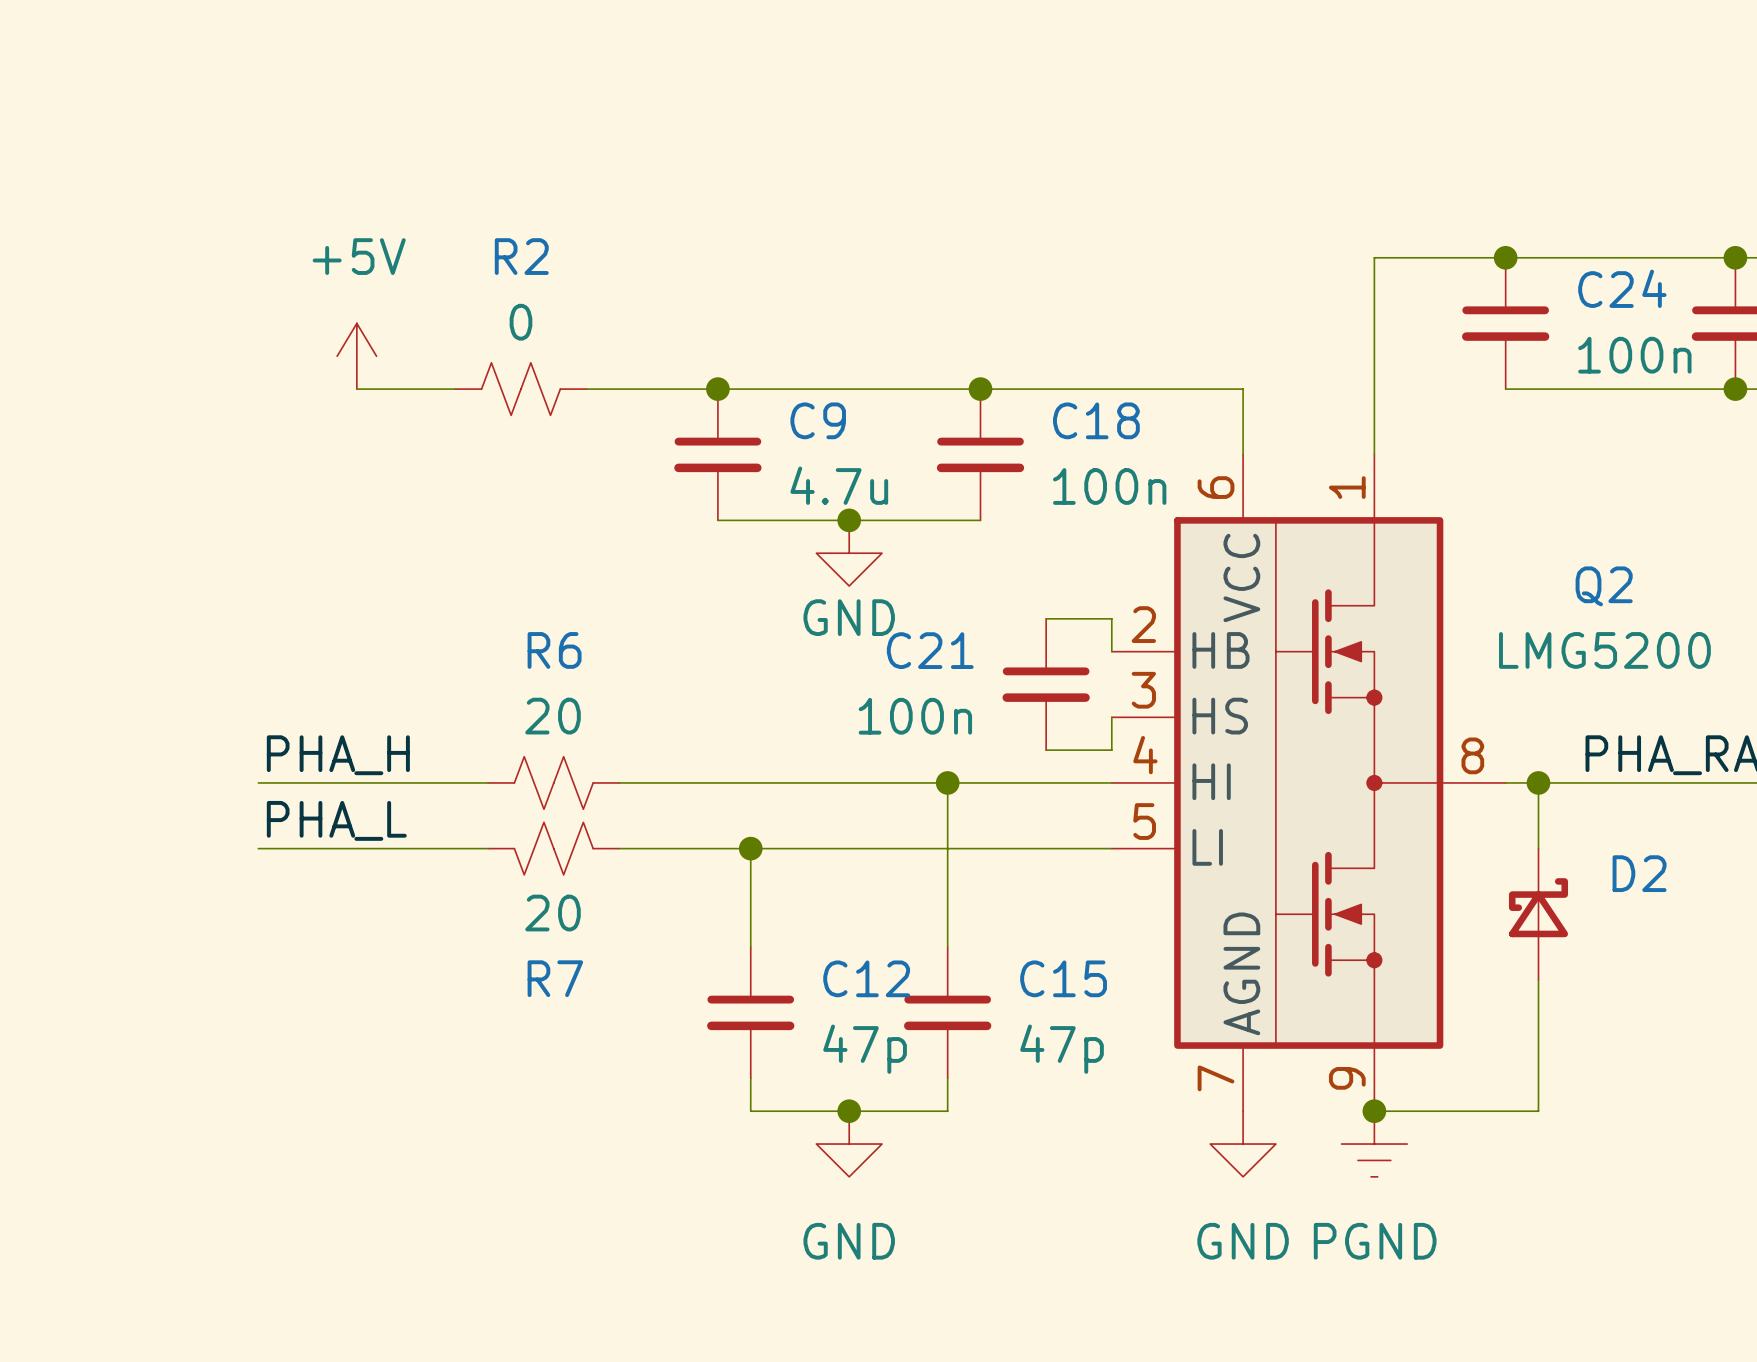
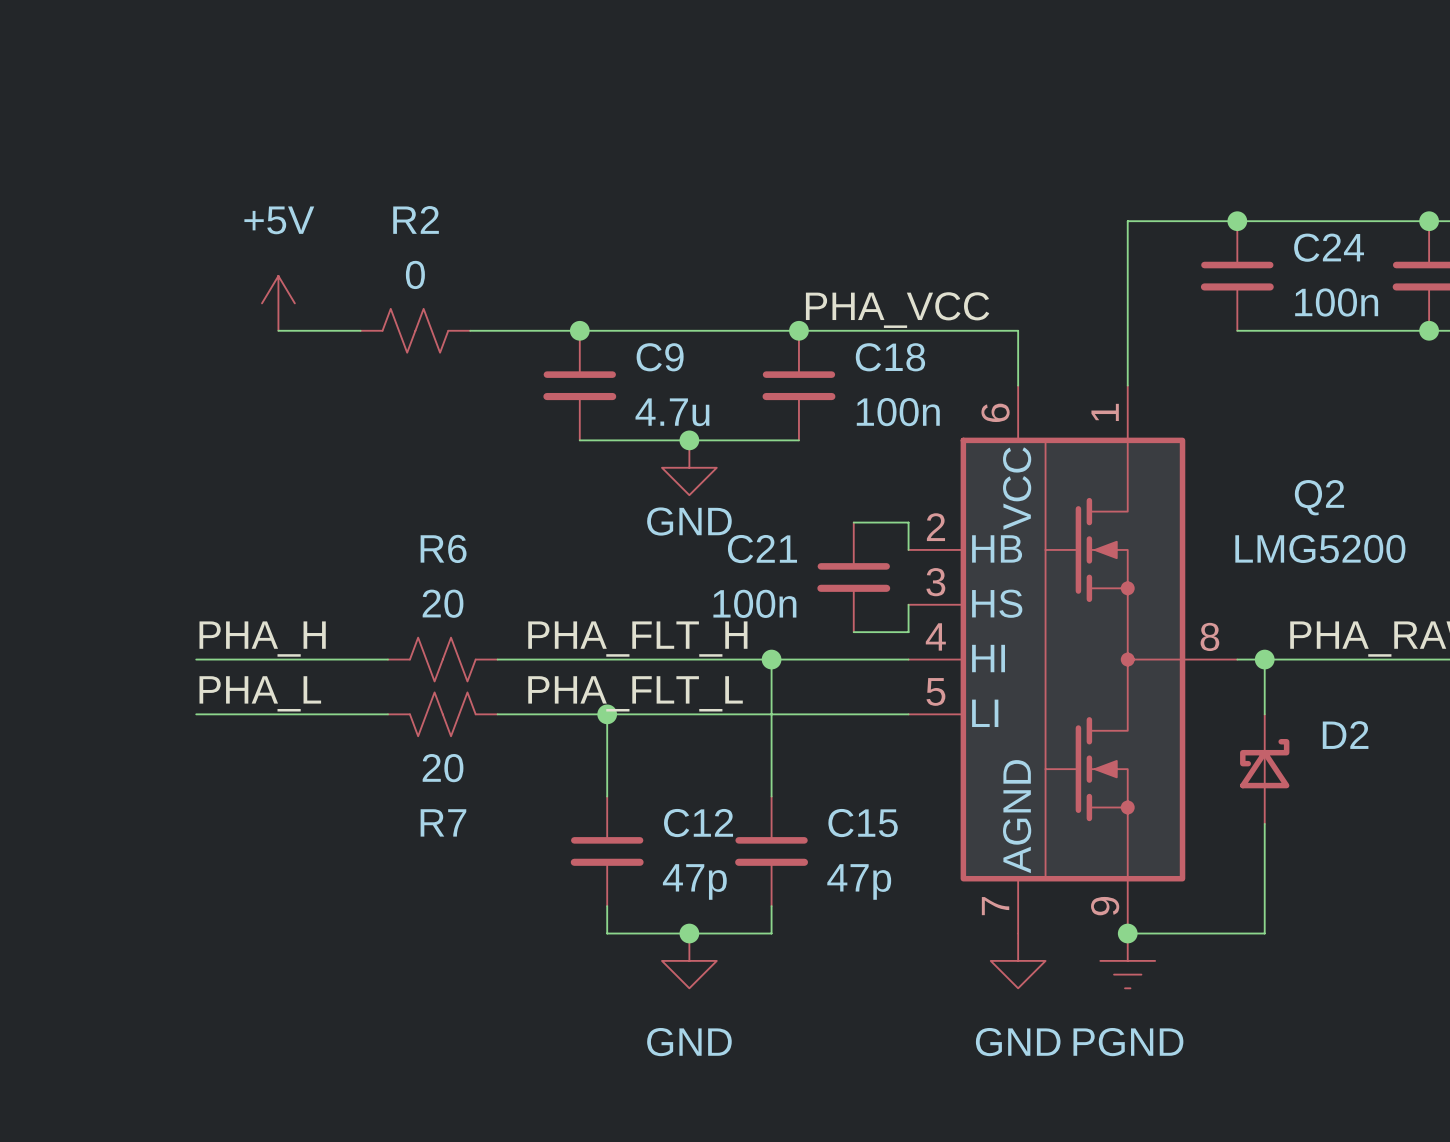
label: none -> PHA_VCC (897, 310)
label: none -> PHA_FLT_H (637, 639)
label: none -> PHA_FLT_L (635, 693)

